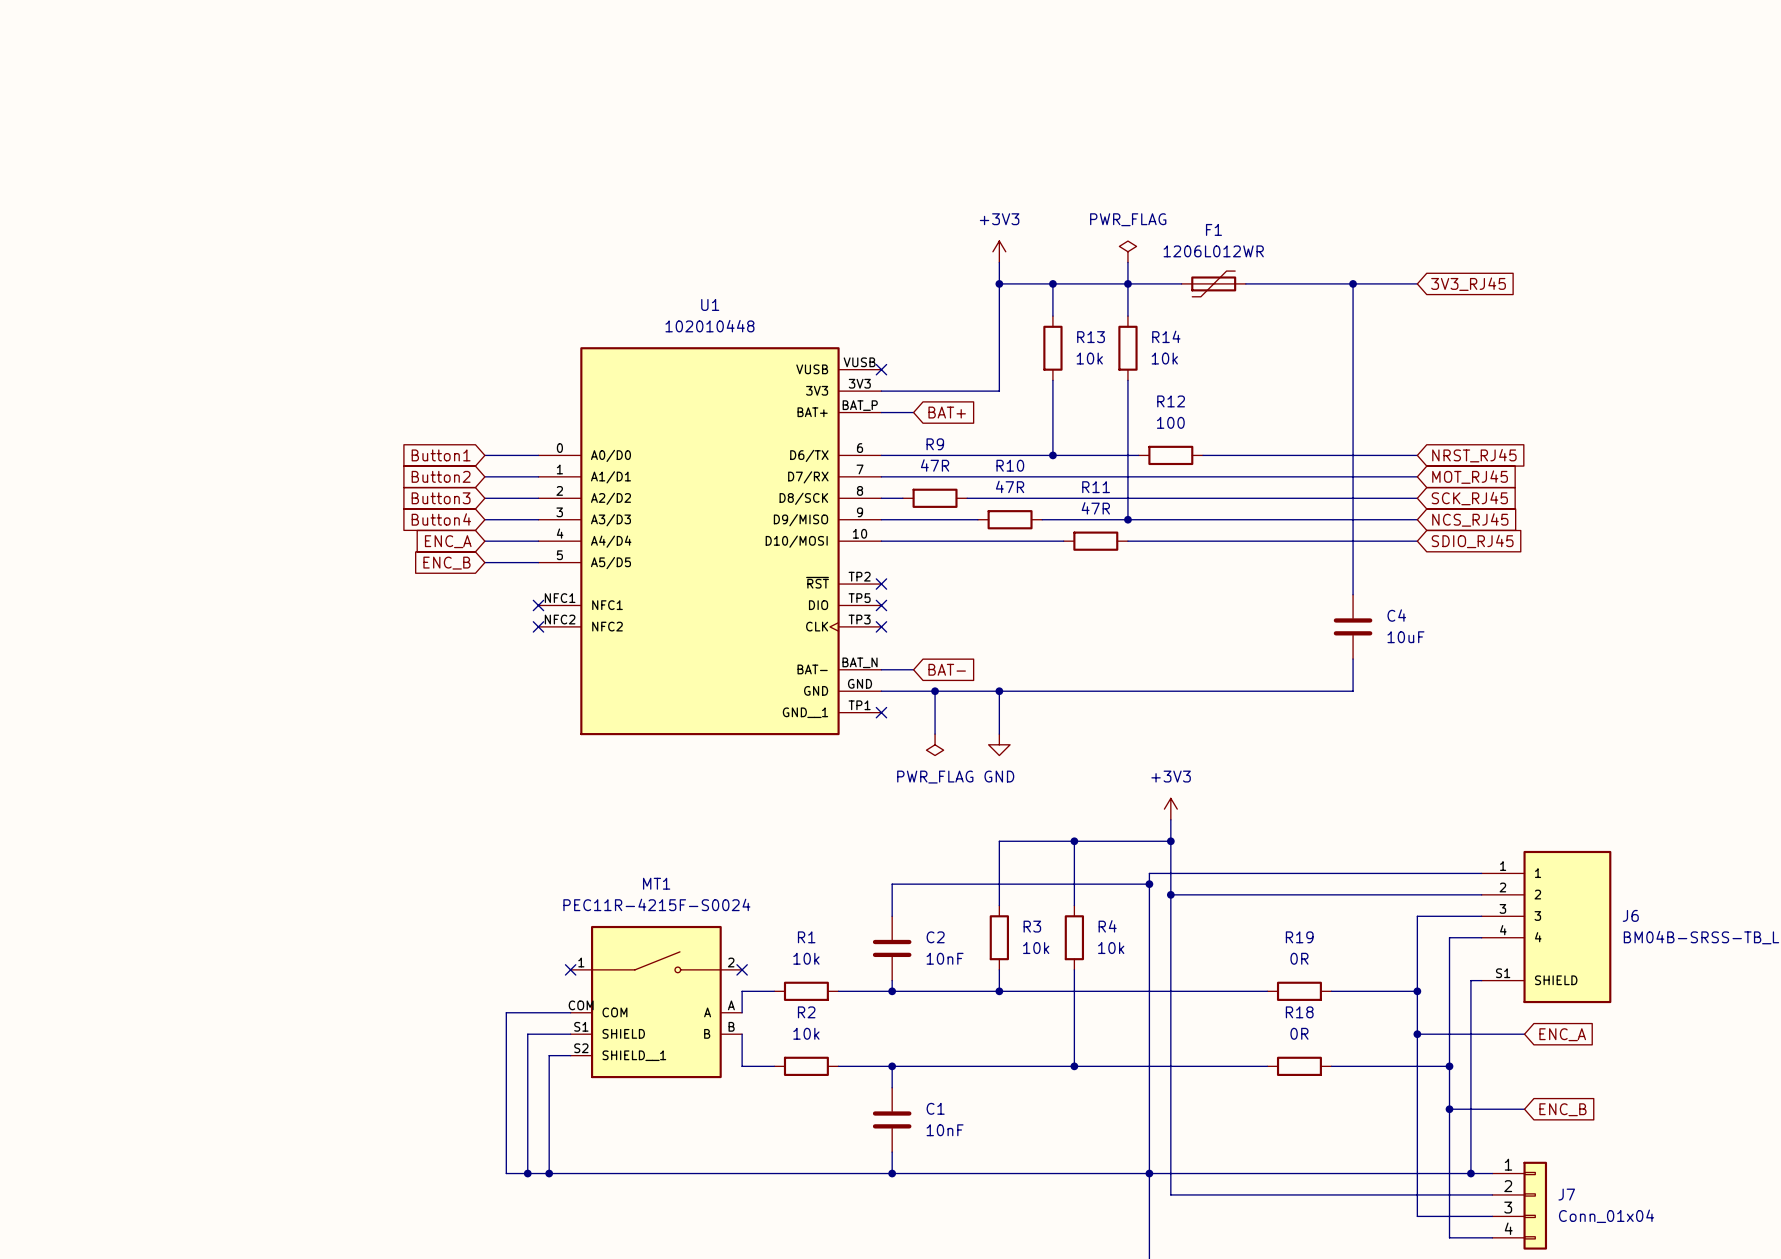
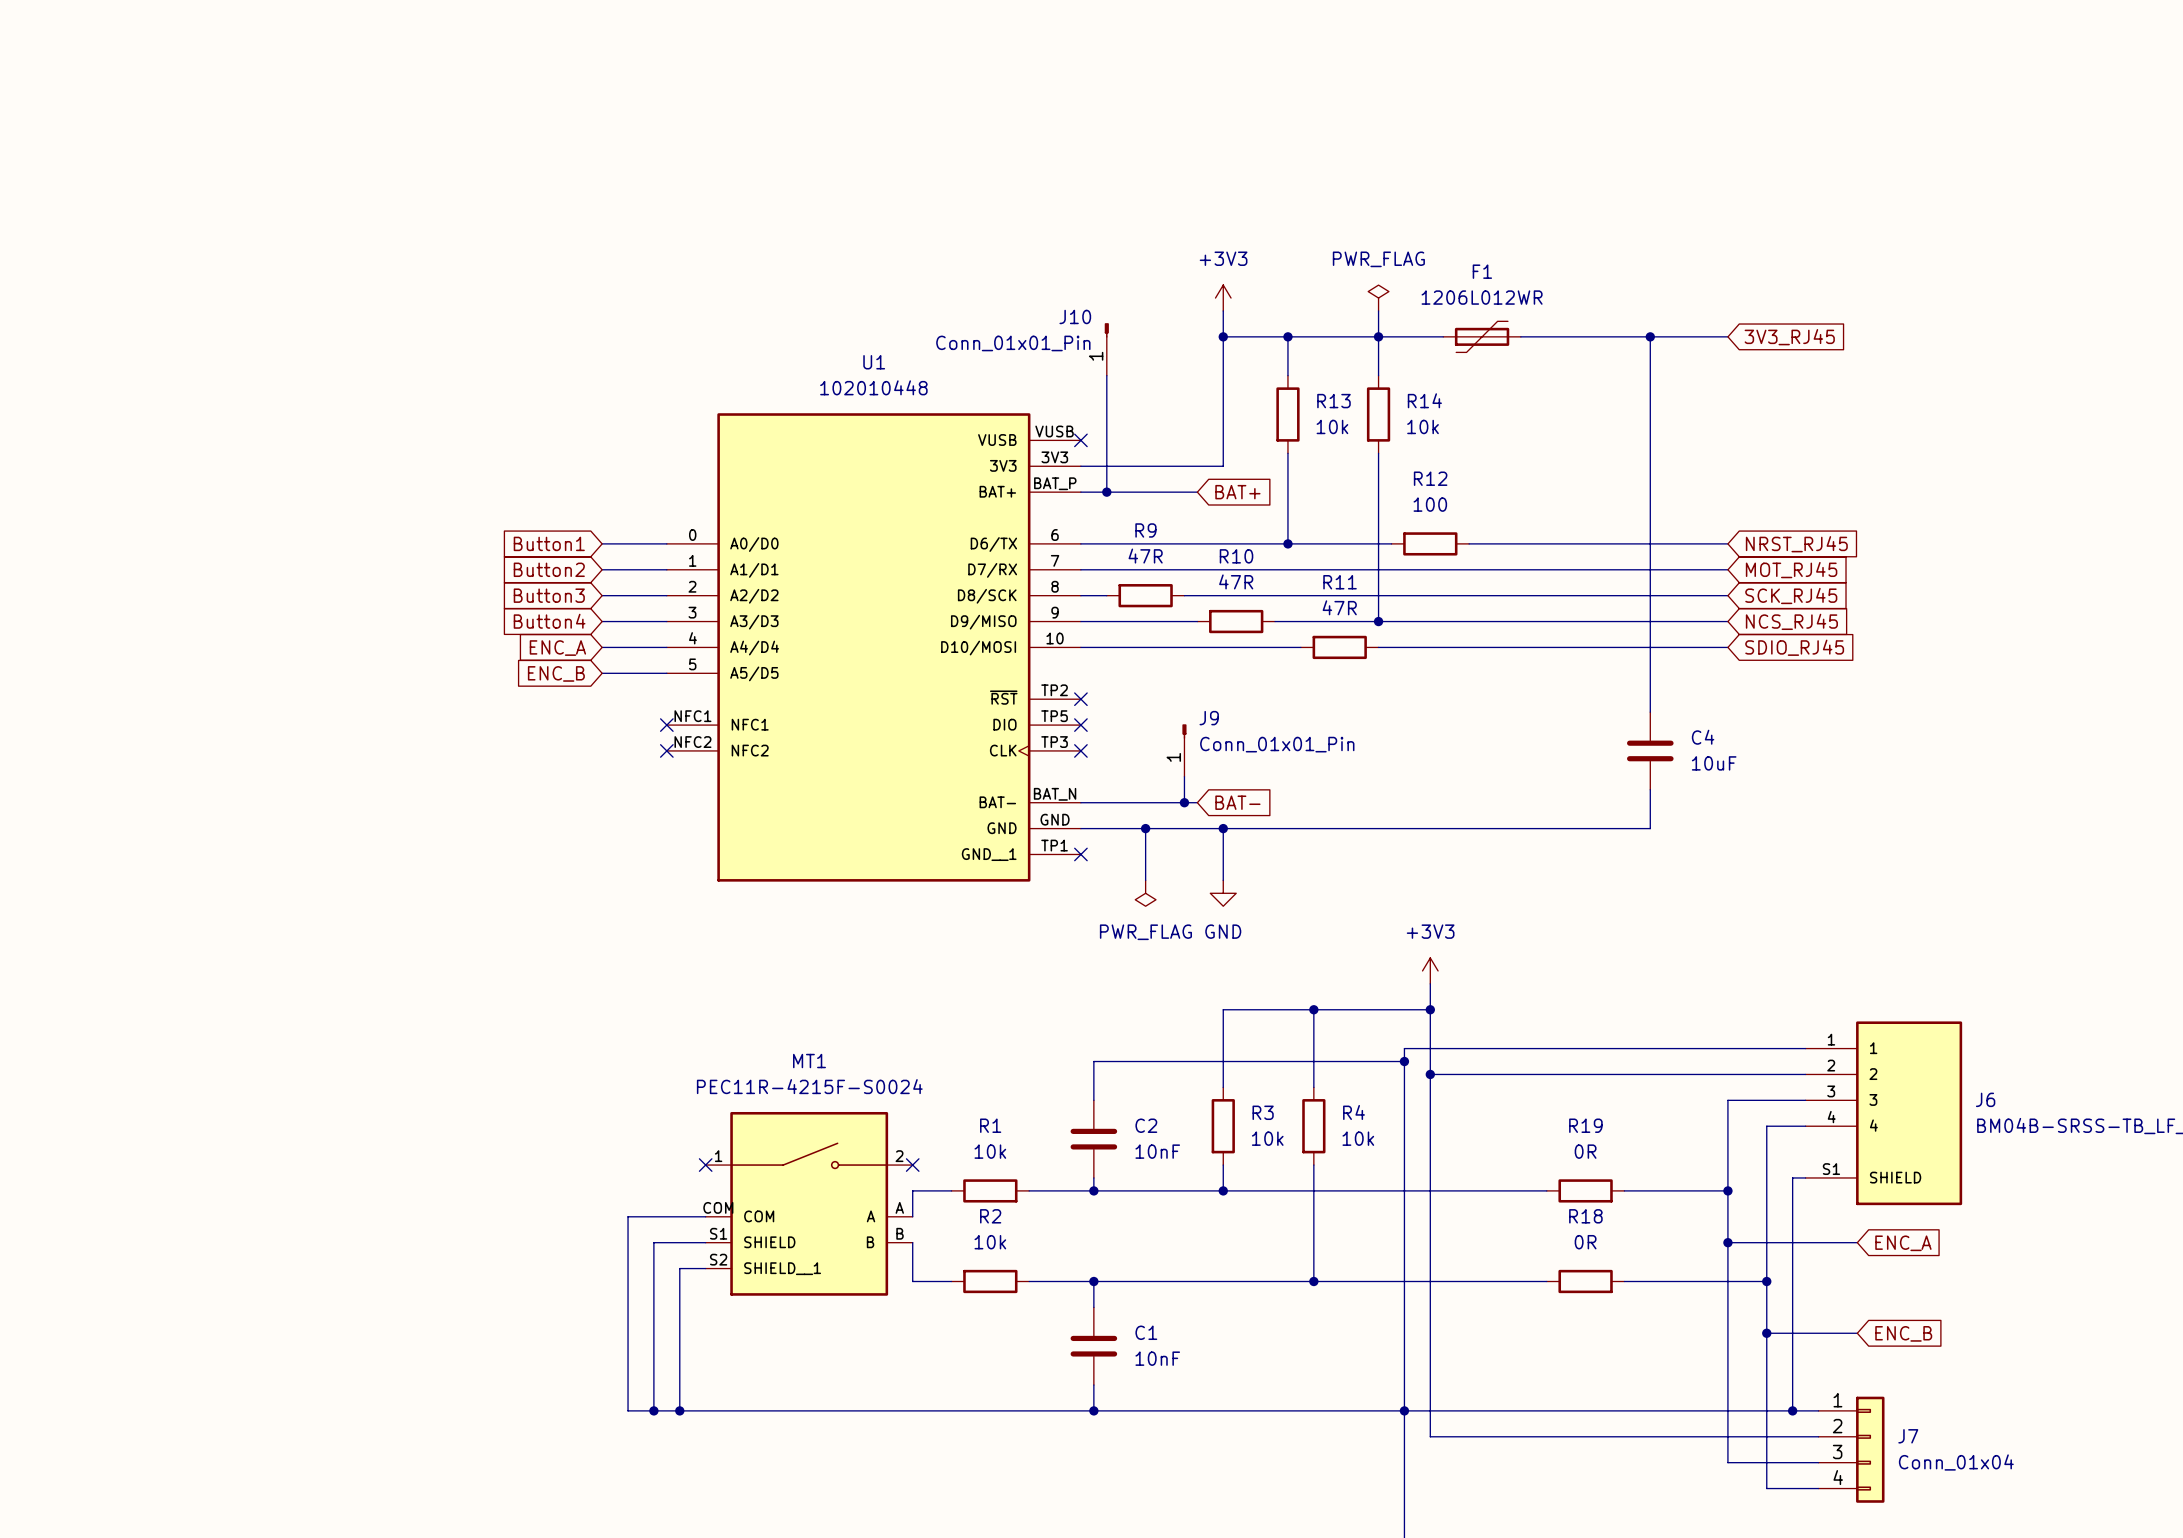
J10: none -> Conn_01x01_Pin (1106, 349)
wire: none -> (1106, 375) (1106, 492)
junction: none -> (1106, 492)
wire: none -> (1119, 492) (1197, 492)
global label position: BAT+ (947, 412) -> BAT+ (1237, 492)
J9: none -> Conn_01x01_Pin (1184, 750)
wire: none -> (1184, 776) (1184, 802)
wire: none -> (1119, 802) (1197, 802)
global label position: BAT- (947, 669) -> BAT- (1237, 802)
junction: none -> (1184, 802)

